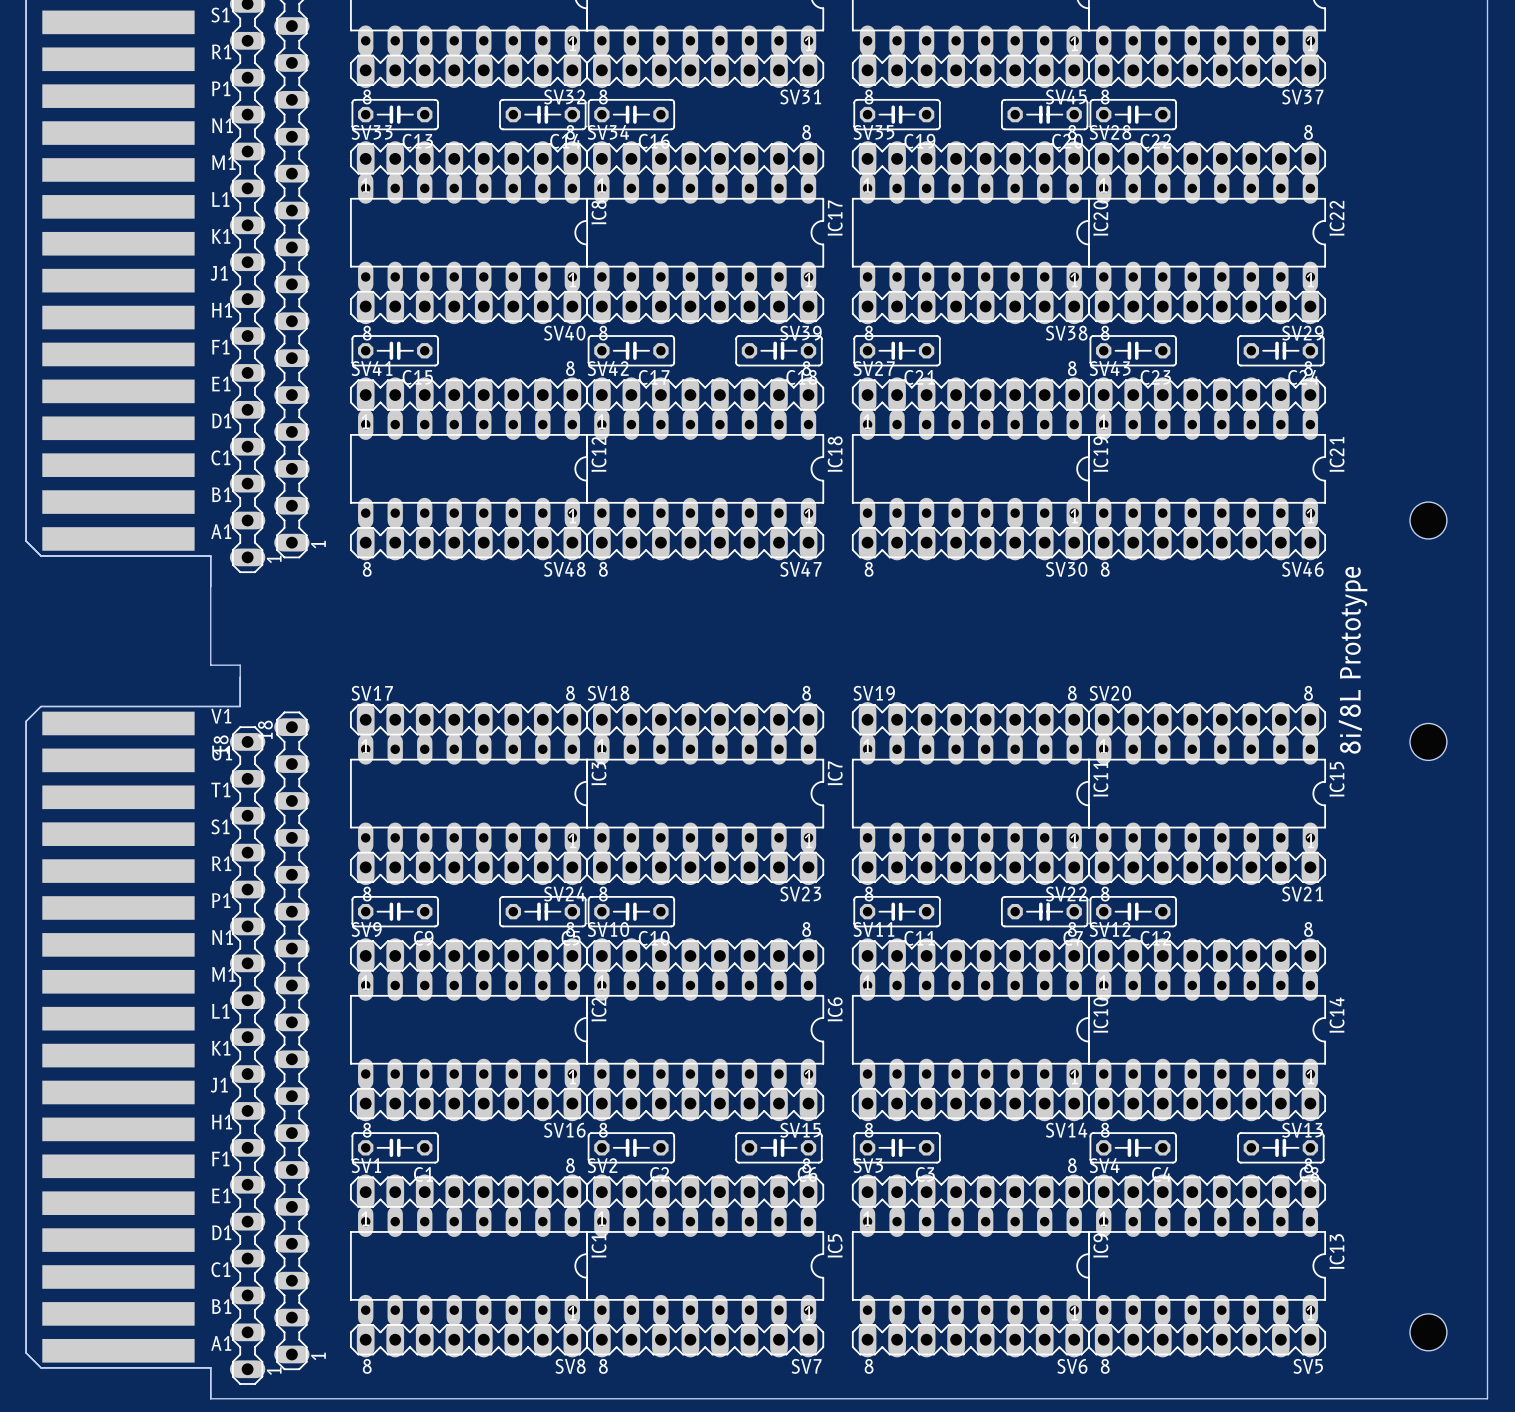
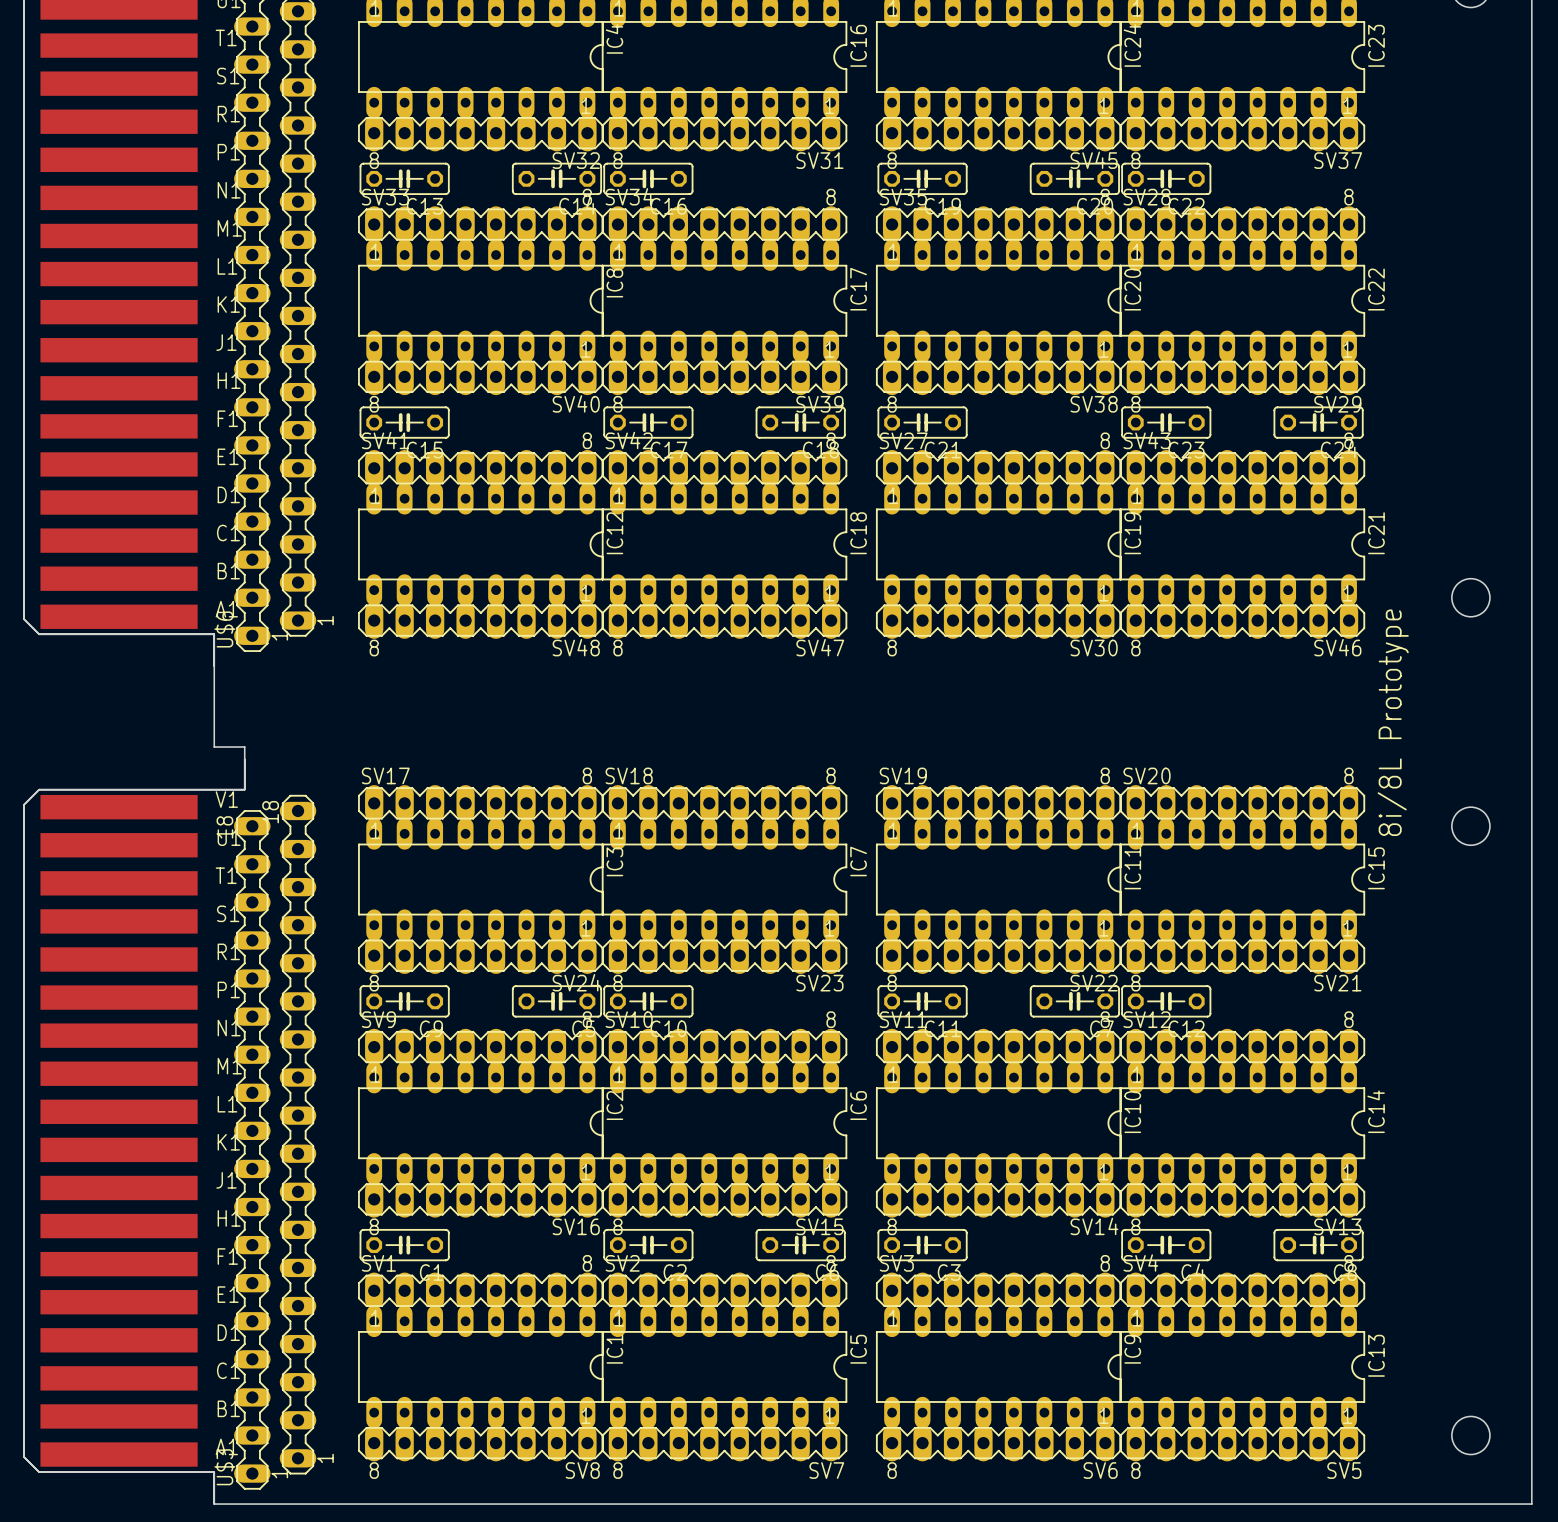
U$6 name: none -> U$6 (224, 629)
U$3 name: none -> U$3 (224, 1467)

